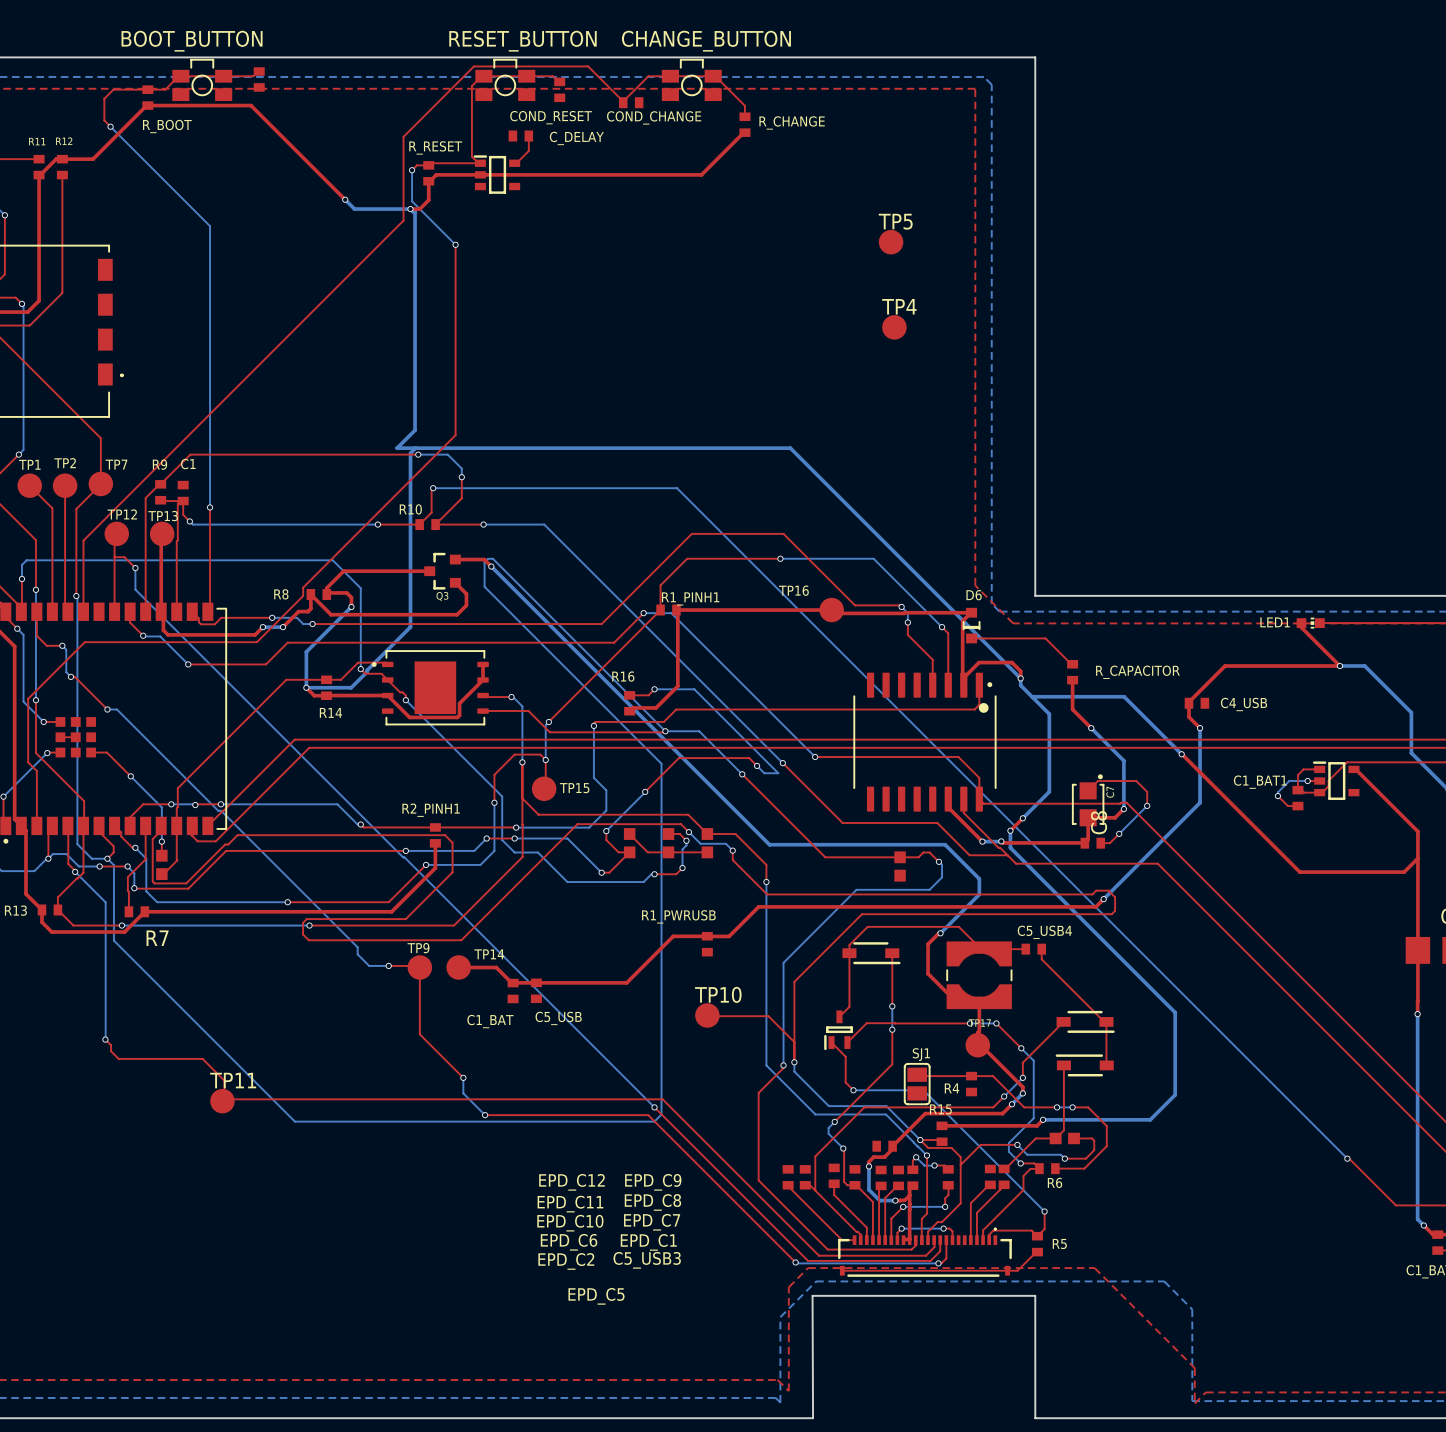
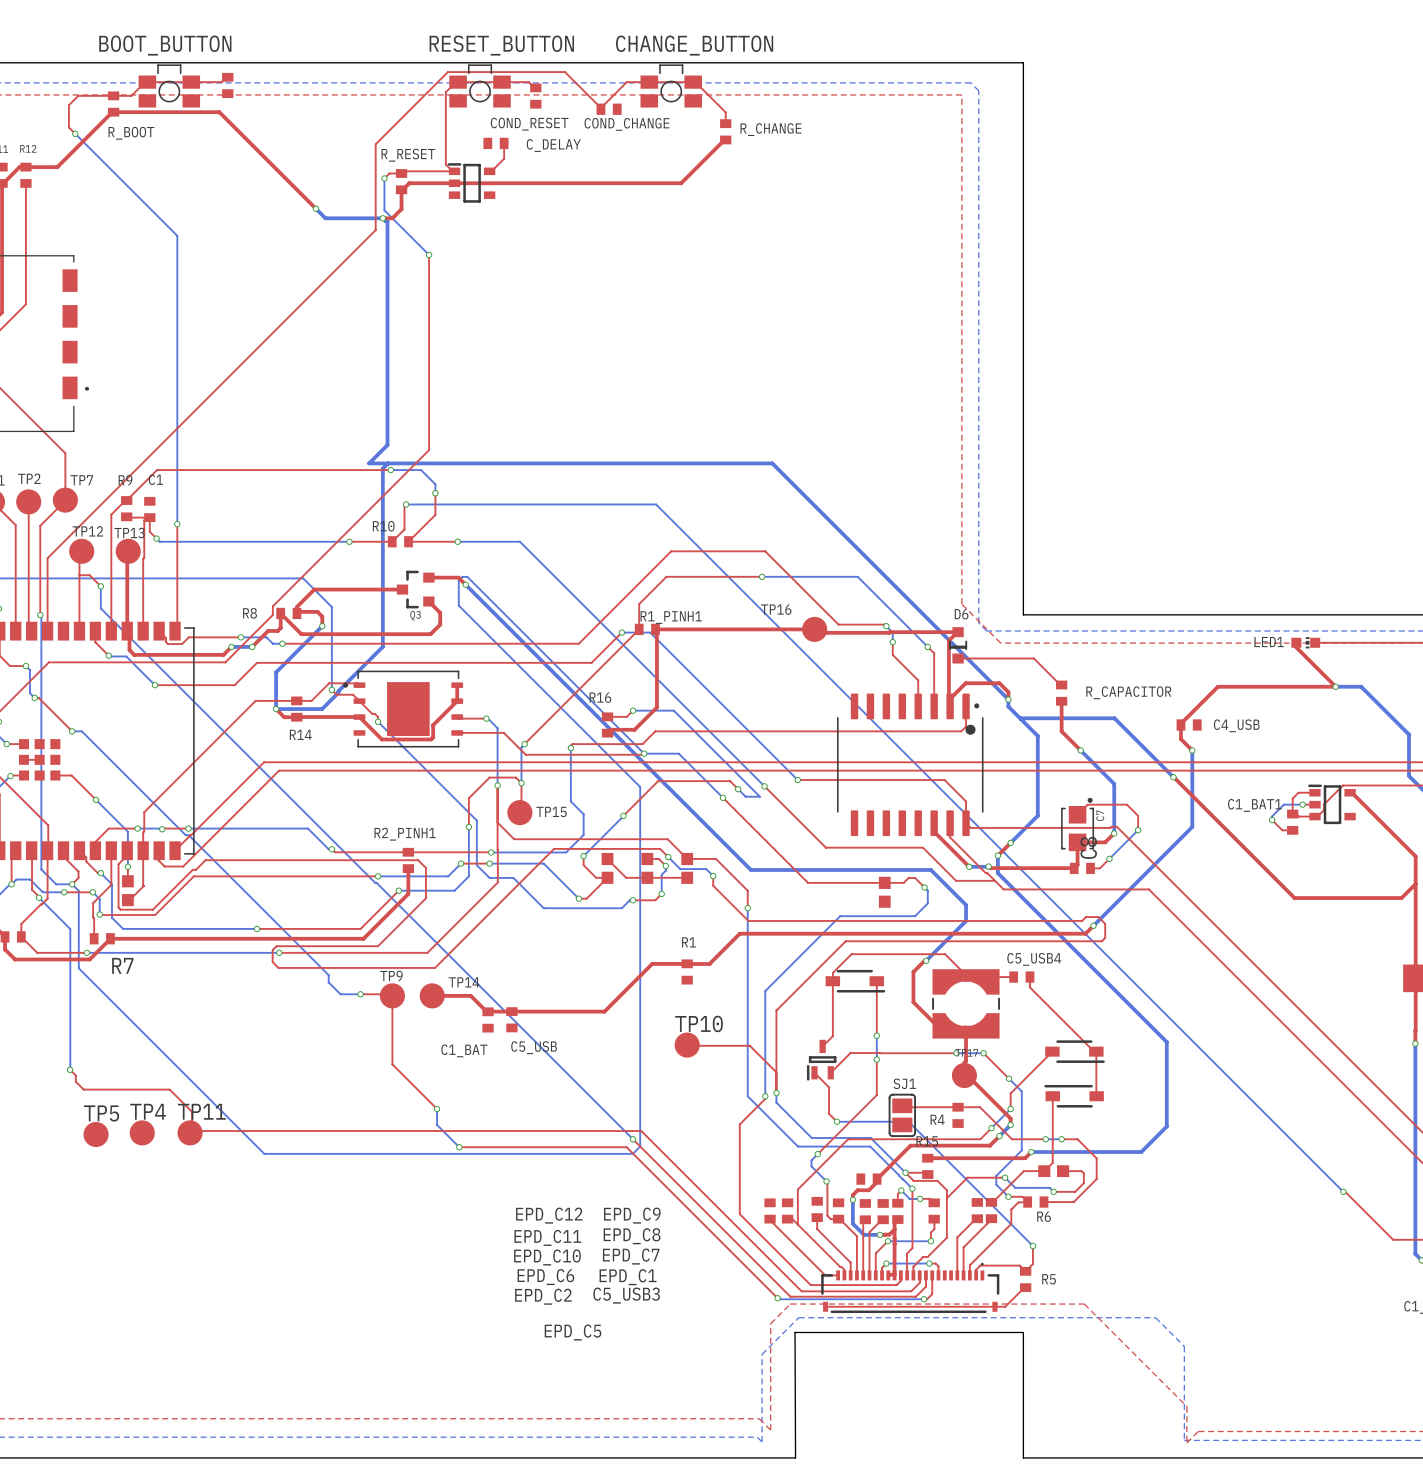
TP5 position: (891, 242) -> (96, 1134)
TP4 position: (894, 327) -> (142, 1132)
R1_PWRUSB name: R1_PWRUSB (678, 916) -> R1 (689, 942)

